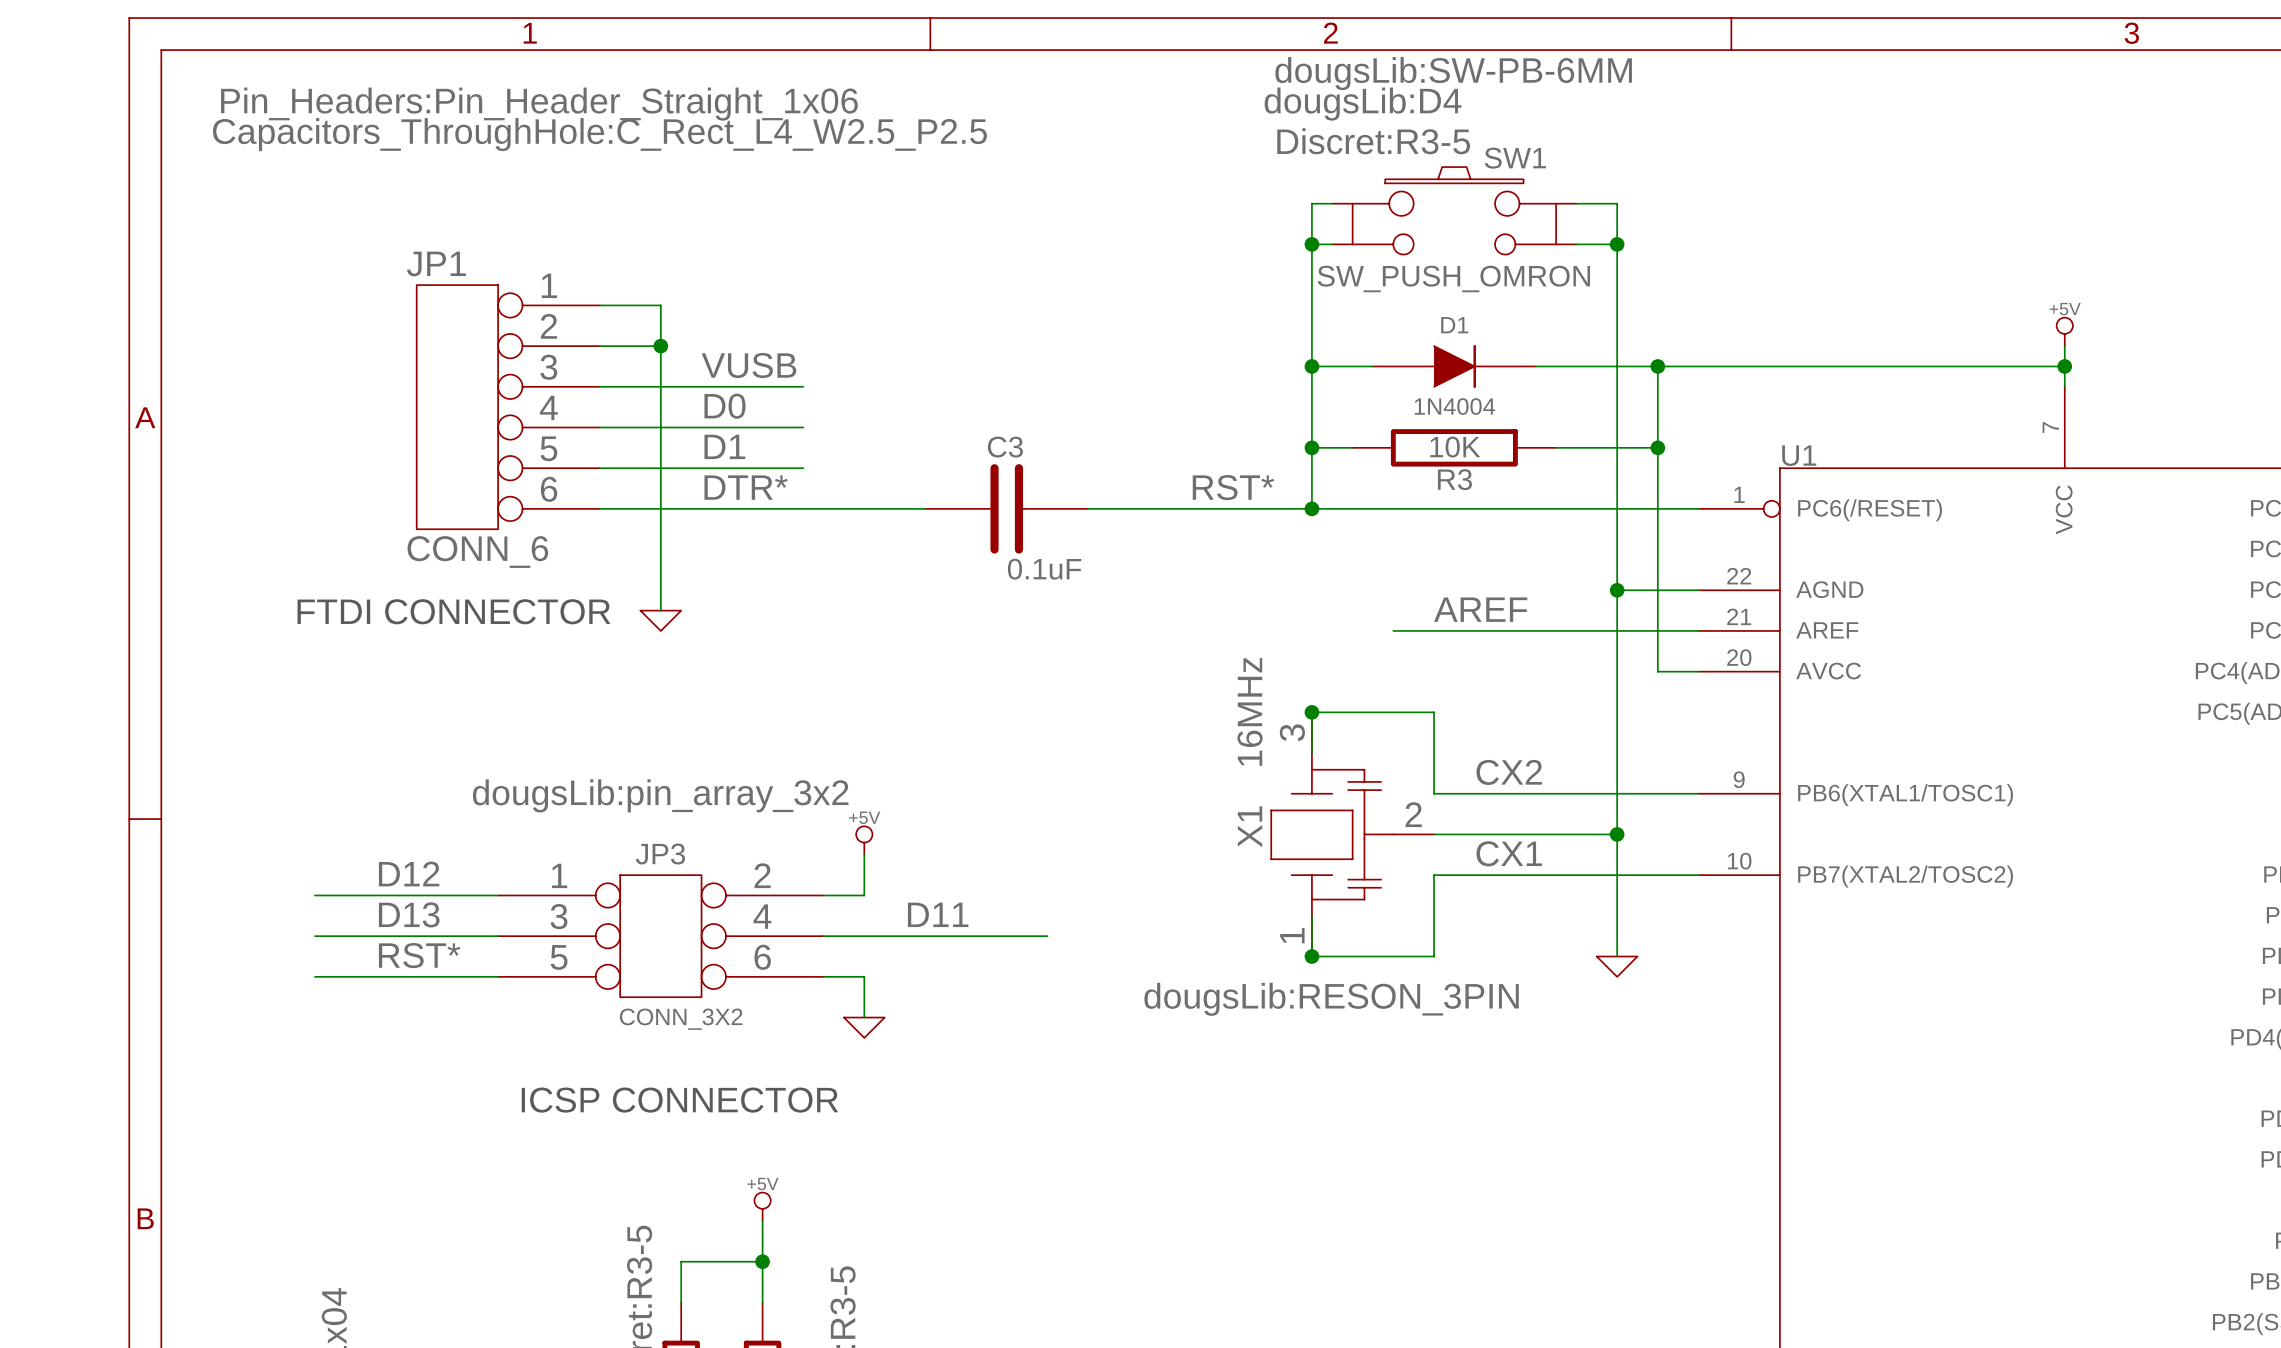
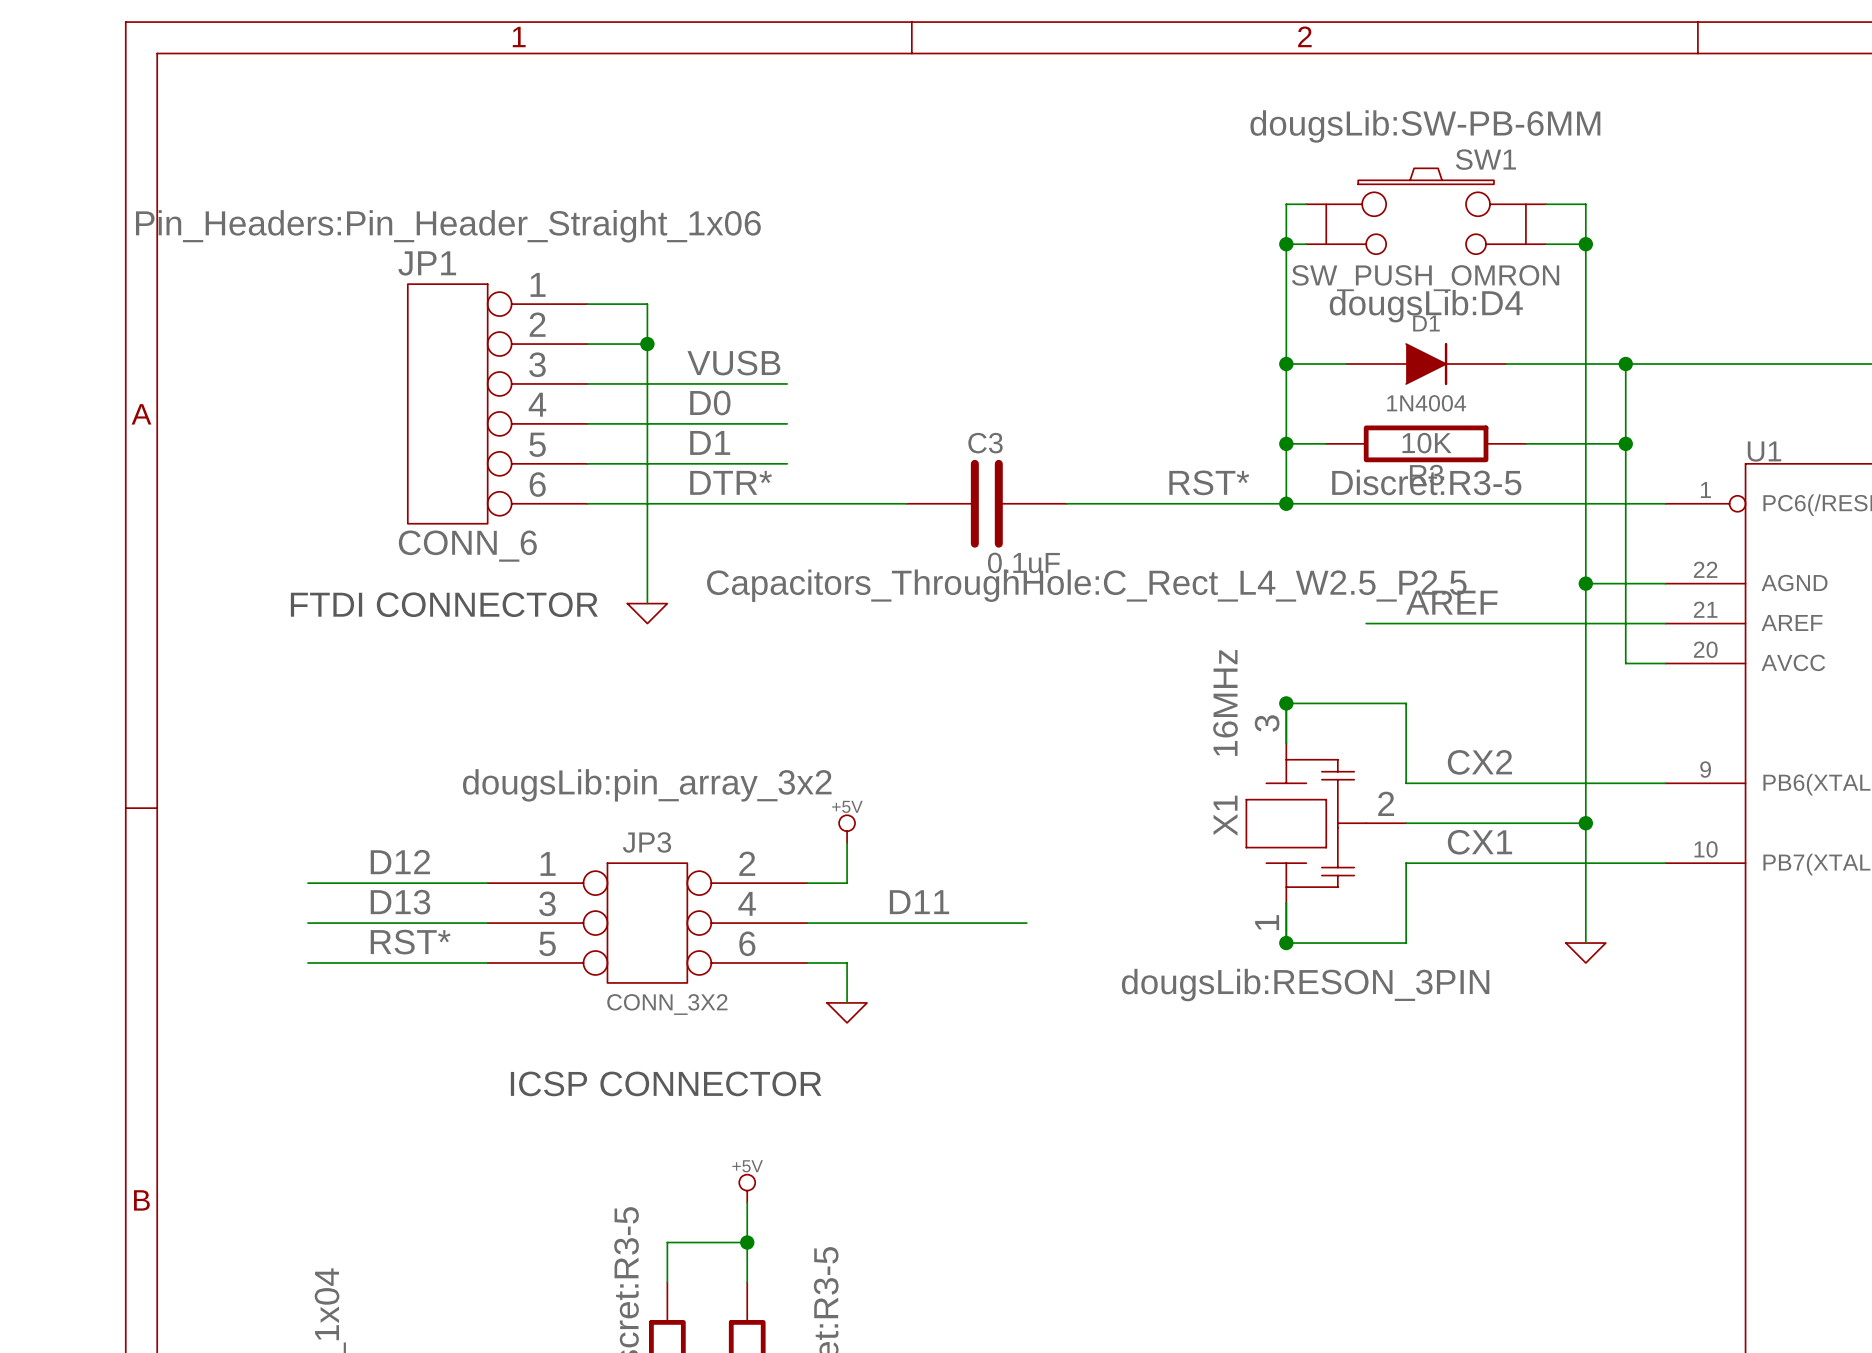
SW1 text position: dougsLib:SW-PB-6MM (1453, 73) -> dougsLib:SW-PB-6MM (1425, 126)
JP1 text position: Pin_Headers:Pin_Header_Straight_1x06 (539, 104) -> Pin_Headers:Pin_Header_Straight_1x06 (448, 226)
D1 text position: dougsLib:D4 (1363, 104) -> dougsLib:D4 (1426, 306)
C3 text position: Capacitors_ThroughHole:C_Rect_L4_W2.5_P2.5 (599, 134) -> Capacitors_ThroughHole:C_Rect_L4_W2.5_P2.5 (1086, 585)
R3 text position: Discret:R3-5 (1373, 141) -> Discret:R3-5 (1426, 482)

